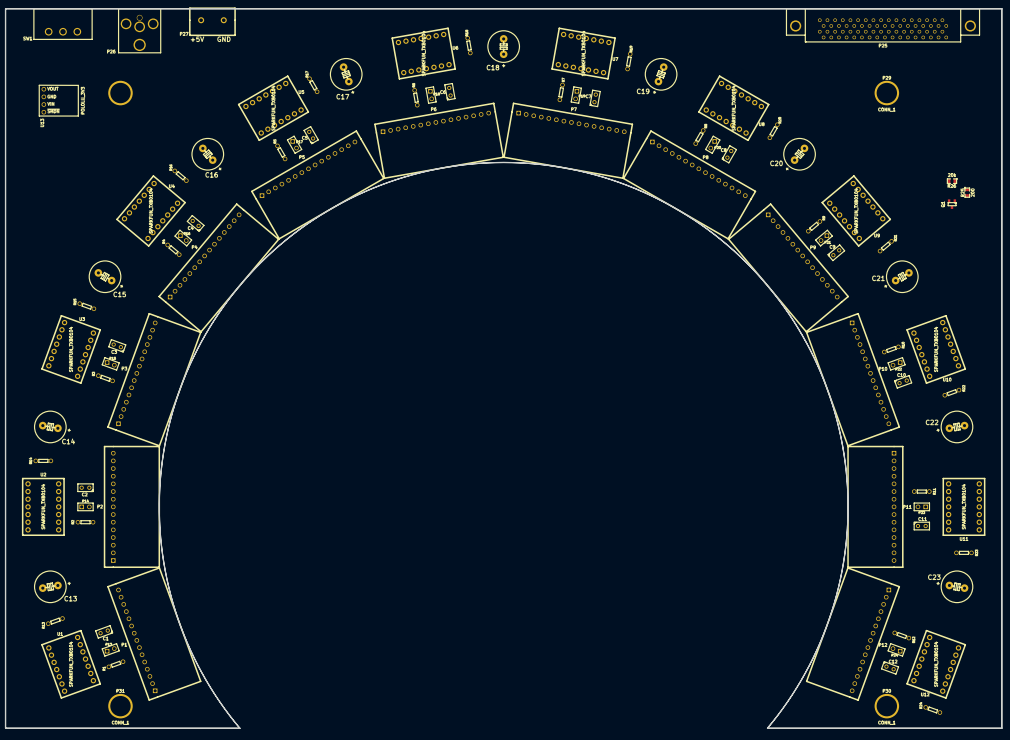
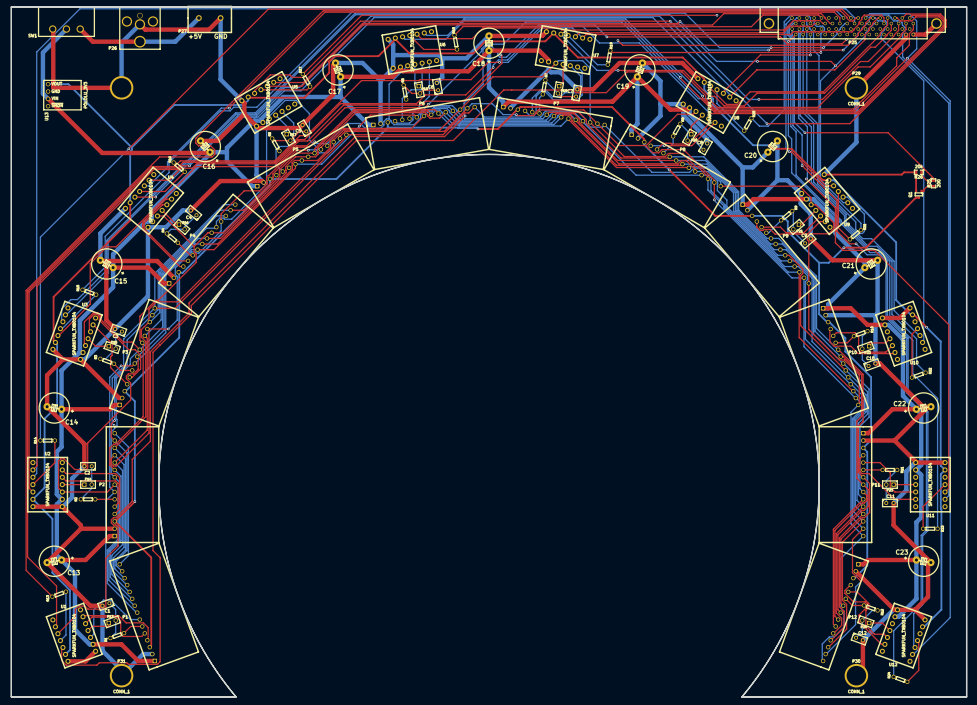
top track: none -> (716, 15) (361, 15) (302, 74)
via: none -> (716, 15)
bottom track: none -> (198, 18) (175, 41) (139, 41)
top track: none -> (220, 18) (209, 29) (145, 29) (139, 24)
bottom track: none -> (220, 18) (220, 79) (241, 100)
bottom track: none -> (792, 17) (785, 24) (785, 148) (789, 151)
bottom track: none -> (799, 17) (796, 17) (787, 26) (787, 35) (790, 37) (790, 126) (796, 131) (796, 175) (869, 249) (878, 249) (889, 261) (889, 317) (912, 340) (912, 373) (937, 398) (937, 528)
bottom track: none -> (806, 17) (806, 24) (813, 32) (813, 50) (819, 55) (819, 181) (860, 223) (860, 230)
bottom track: none -> (814, 17) (814, 23) (816, 26) (824, 27) (820, 33) (820, 52)
top track: none -> (821, 17) (818, 15) (762, 15) (751, 26) (463, 26) (454, 35)
bottom track: none -> (843, 17) (835, 10) (353, 10) (256, 107) (233, 107) (230, 110) (220, 110) (169, 162) (169, 172) (105, 236) (105, 267) (82, 289)
top track: none -> (850, 17) (842, 9) (268, 9) (128, 148)
top track: none -> (858, 17) (849, 20) (840, 10) (323, 10) (195, 138) (195, 142) (198, 145) (210, 145) (214, 150) (214, 154) (212, 156) (159, 156) (26, 290) (26, 570) (52, 596)
bottom track: none -> (865, 17) (869, 13) (909, 13) (916, 21) (916, 48) (907, 58) (950, 101) (950, 617) (912, 654)
top track: none -> (872, 17) (865, 23) (858, 34) (847, 45) (622, 45) (617, 40)
bottom track: none -> (872, 17) (886, 22) (886, 25) (881, 33) (881, 38) (923, 80) (922, 342)
top track: none -> (880, 17) (877, 17) (869, 27) (865, 34) (865, 39) (834, 69) (756, 69) (729, 97)
top track: none -> (887, 17) (887, 24) (880, 34) (823, 91) (750, 91) (737, 104) (726, 104) (710, 88) (710, 86)
top track: none -> (894, 17) (900, 20) (911, 20) (915, 16) (939, 16) (943, 20) (943, 26) (857, 112) (714, 112) (680, 77)
top track: none -> (902, 17) (906, 13) (940, 13) (946, 19) (946, 27) (849, 123) (766, 123)
top track: none -> (909, 17) (912, 15) (939, 15) (944, 20) (944, 26) (857, 113) (708, 112)
top track: none -> (670, 21) (360, 21) (304, 77) (270, 74) (254, 90) (254, 93)
bottom track: none -> (670, 21) (748, 99) (758, 99)
via: none -> (670, 21)
top track: none -> (680, 21) (677, 23) (362, 23) (303, 82) (273, 82)
bottom track: none -> (680, 21) (708, 50) (768, 50)
via: none -> (680, 21)
bottom track: none -> (795, 23) (789, 27) (789, 34) (792, 38) (792, 125) (802, 134) (802, 165)
bottom track: none -> (803, 23) (803, 30) (800, 33) (800, 115) (811, 127) (811, 182) (844, 215) (844, 222) (868, 246) (876, 246) (891, 261) (891, 314) (916, 338) (916, 363) (925, 372)
bottom track: none -> (810, 23) (810, 17) (807, 15) (790, 15) (784, 21) (784, 110) (768, 126) (759, 126) (751, 118)
top track: none -> (817, 23) (811, 26) (790, 26) (783, 32) (579, 32) (575, 36)
top track: none -> (825, 23) (819, 20) (793, 20) (784, 29) (483, 27) (472, 38) (421, 38) (417, 34)
top track: none -> (832, 23) (830, 23) (821, 13) (723, 13) (712, 25) (363, 24) (301, 86) (267, 86)
top track: none -> (839, 23) (839, 17) (834, 12) (324, 12) (229, 108)
bottom track: none -> (847, 23) (840, 28) (823, 47)
bottom track: none -> (854, 23) (854, 17) (845, 8) (79, 8) (36, 52) (36, 473) (32, 477)
bottom track: none -> (876, 23) (868, 29) (865, 35) (820, 80) (820, 179) (843, 202) (847, 202)
top track: none -> (883, 23) (883, 17) (881, 15) (864, 15) (852, 31) (793, 31) (790, 34) (586, 34) (582, 38)
top track: none -> (891, 23) (891, 30) (887, 35) (875, 47) (870, 47) (824, 93) (756, 93) (744, 105) (724, 105) (714, 96) (709, 96) (683, 70) (618, 70)
top track: none -> (898, 23) (898, 30) (868, 61) (860, 61) (822, 99) (758, 99)
top track: none -> (905, 23) (905, 29) (901, 35) (870, 66) (858, 66) (817, 107) (717, 107) (708, 98)
top track: none -> (913, 23) (913, 29) (909, 33) (909, 45) (896, 57) (896, 65) (853, 109) (715, 109) (705, 99) (705, 95) (681, 71) (627, 71) (606, 92) (575, 92) (573, 90) (503, 90) (453, 140) (356, 140) (191, 305) (191, 313) (153, 352) (153, 550) (160, 557) (160, 661) (157, 664) (99, 662) (96, 665) (66, 665) (61, 660) (62, 647)
top track: none -> (936, 23) (925, 34) (913, 34)
bottom track: none -> (139, 24) (121, 42) (121, 87)
top track: none -> (52, 29) (53, 87) (121, 87)
bottom track: none -> (66, 29) (42, 52) (42, 93) (48, 98)
top track: none -> (80, 29) (92, 41) (139, 41)
bottom track: none -> (792, 29) (792, 35) (794, 37) (794, 122) (804, 132)
bottom track: none -> (799, 29) (798, 118) (807, 126) (806, 178)
bottom track: none -> (806, 29) (806, 112) (817, 123) (817, 183) (855, 221) (855, 229) (862, 233) (864, 231) (864, 214) (847, 197) (843, 197)
top track: none -> (546, 31) (542, 35) (488, 35)
bottom track: none -> (424, 32) (426, 35) (447, 35) (463, 19) (625, 19) (702, 96)
bottom track: none -> (560, 34) (597, 70) (618, 70)
top track: none -> (795, 34) (788, 41)
bottom track: none -> (803, 34) (803, 112) (813, 123) (813, 182) (846, 214) (846, 221) (862, 238) (871, 238) (894, 261) (894, 310) (920, 335)
bottom track: none -> (810, 34) (810, 54)
top track: none -> (905, 34) (905, 38) (856, 87)
top track: none -> (409, 35) (423, 49) (457, 49)
bottom track: none -> (488, 35) (466, 58) (442, 58)
bottom track: none -> (568, 35) (597, 64) (607, 64)
bottom track: none -> (402, 36) (405, 39) (445, 39) (464, 20) (623, 20) (680, 77)
top track: none -> (606, 36) (780, 36) (787, 43) (842, 43) (846, 39)
bottom track: none -> (606, 36) (594, 24) (538, 24) (506, 57) (499, 57) (490, 45) (486, 45) (483, 49) (483, 84) (464, 103) (465, 116)
via: none -> (606, 36)
bottom track: none -> (582, 38) (572, 27) (542, 27) (508, 62) (499, 62)
bottom track: none -> (388, 39) (393, 44) (393, 68) (380, 80)
top track: none -> (395, 39) (409, 53) (473, 53) (485, 41) (545, 41) (553, 32) (577, 57) (682, 57) (704, 79) (704, 82)
top track: none -> (395, 39) (378, 56) (334, 56) (329, 61) (329, 72) (304, 97) (248, 97)
via: none -> (846, 39)
via: none -> (617, 40)
bottom track: none -> (788, 41) (788, 135) (791, 138) (791, 172) (869, 252) (878, 252) (887, 261) (887, 317) (908, 337) (908, 392) (927, 411) (927, 530) (922, 535) (922, 604) (913, 613) (915, 647)
via: none -> (788, 41)
top track: none -> (771, 47) (823, 47)
bottom track: none -> (771, 47) (719, 47) (685, 13) (355, 13) (255, 112) (235, 112) (106, 240) (106, 270) (77, 299) (70, 299) (61, 308) (62, 321)
via: none -> (771, 47)
via: none -> (823, 47)
top track: none -> (768, 50) (843, 50)
via: none -> (768, 50)
bottom track: none -> (843, 50) (857, 35) (861, 28) (869, 23) (869, 17) (871, 15) (888, 15) (893, 20) (899, 20) (905, 27) (902, 33) (902, 56) (948, 102) (948, 495) (945, 499)
via: none -> (843, 50)
bottom track: none -> (488, 50) (488, 87) (503, 101) (503, 107)
top track: none -> (610, 50) (612, 52) (820, 52)
via: none -> (820, 52)
bottom track: none -> (393, 55) (439, 55) (442, 58)
top track: none -> (500, 54) (501, 63) (464, 101) (425, 101) (421, 105) (343, 105) (307, 141) (298, 141) (276, 163) (196, 163) (192, 168) (181, 168) (169, 180) (149, 180)
via: none -> (500, 54)
top track: none -> (810, 54) (760, 54) (723, 93)
via: none -> (810, 54)
bottom track: none -> (442, 58) (442, 77) (436, 82)
top track: none -> (907, 58) (854, 110) (715, 110) (702, 96)
via: none -> (907, 58)
bottom track: none -> (429, 61) (429, 96) (412, 112) (412, 119) (409, 123) (397, 123) (395, 121)
top track: none -> (548, 61) (539, 50) (488, 50) (468, 71) (402, 71) (400, 69)
top track: none -> (757, 61) (831, 61) (835, 65)
bottom track: none -> (757, 61) (716, 61) (669, 14) (355, 14) (255, 114) (236, 114) (108, 241) (108, 272) (65, 314)
via: none -> (757, 61)
top track: none -> (499, 62) (488, 62) (470, 79) (361, 80) (306, 135) (300, 135) (274, 160) (180, 160) (174, 166) (152, 166) (27, 291) (27, 557) (56, 586) (55, 626)
via: none -> (499, 62)
top track: none -> (335, 62) (333, 65) (333, 94) (299, 128) (258, 128) (244, 113)
bottom track: none -> (335, 62) (362, 62) (380, 80)
bottom track: none -> (422, 63) (422, 88) (411, 89) (402, 98) (402, 119)
top track: none -> (555, 63) (542, 76) (492, 76) (439, 129) (343, 129) (333, 140) (333, 146) (178, 301) (156, 301) (148, 309) (148, 322)
bottom track: none -> (555, 63) (558, 60) (582, 60) (590, 68) (590, 122)
bottom track: none -> (642, 62) (660, 80) (660, 115) (637, 138)
bottom track: none -> (414, 64) (414, 82) (418, 86)
top track: none -> (563, 64) (563, 82) (559, 86)
bottom track: none -> (407, 65) (389, 84) (389, 118)
bottom track: none -> (570, 65) (580, 76) (580, 90) (578, 92) (564, 92) (560, 96) (552, 96) (545, 89) (540, 89) (532, 98) (532, 112)
via: none -> (835, 65)
top track: none -> (493, 67) (465, 94) (425, 94) (416, 103) (340, 103) (304, 139) (298, 139) (275, 162) (183, 162) (177, 168) (152, 168) (29, 291) (29, 488) (32, 491)
bottom track: none -> (493, 67) (498, 59) (507, 59) (541, 26) (582, 26) (599, 42) (639, 42) (708, 112)
via: none -> (493, 67)
bottom track: none -> (577, 67) (582, 71) (582, 94) (577, 99) (553, 99) (544, 91) (541, 91) (536, 96) (536, 113) (529, 115) (525, 110)
top track: none -> (400, 69) (392, 76) (340, 76)
via: none -> (618, 70)
bottom track: none -> (340, 76) (340, 96)
bottom track: none -> (637, 76) (637, 123) (631, 129) (631, 134)
via: none -> (680, 77)
top track: none -> (697, 78) (682, 62) (619, 62) (593, 89) (577, 89)
bottom track: none -> (545, 80) (557, 93)
bottom track: none -> (380, 80) (380, 123)
bottom track: none -> (704, 82) (704, 89) (713, 98) (713, 105) (753, 145) (768, 145)
bottom track: none -> (48, 84) (68, 84) (131, 147)
top track: none -> (403, 85) (411, 93) (420, 93) (423, 90) (438, 90)
top track: none -> (310, 86) (306, 89) (260, 89)
bottom track: none -> (856, 87) (856, 142) (824, 174)
bottom track: none -> (577, 89) (560, 72) (550, 72) (548, 69) (510, 108)
bottom track: none -> (717, 89) (717, 103) (744, 130)
top track: none -> (557, 93) (561, 96) (576, 96)
bottom track: none -> (542, 94) (539, 97) (539, 113)
via: none -> (702, 96)
bottom track: none -> (248, 97) (248, 100) (243, 104) (174, 104) (131, 147)
bottom track: none -> (340, 96) (283, 96) (261, 120)
bottom track: none -> (340, 96) (368, 124) (373, 124)
bottom track: none -> (729, 97) (729, 94) (652, 17) (374, 17) (300, 90) (284, 90) (257, 117) (238, 117) (189, 165)
top track: none -> (48, 98) (102, 152) (210, 152)
bottom track: none -> (708, 98) (698, 98) (621, 22) (525, 22) (503, 44) (486, 44) (481, 51) (428, 104)
via: none -> (758, 99)
top track: none -> (241, 100) (244, 103) (244, 113)
top track: none -> (428, 104) (424, 107) (345, 107) (307, 145) (296, 145) (275, 166) (196, 166) (116, 246) (107, 246) (90, 263) (90, 304) (57, 335)
via: none -> (428, 104)
bottom track: none -> (660, 104) (683, 104) (683, 115) (707, 139) (707, 143)
top track: none -> (474, 107) (468, 112) (464, 112) (443, 134) (346, 134) (174, 308) (154, 308)
bottom track: none -> (474, 107) (484, 117) (540, 117) (545, 111) (577, 111) (586, 119) (586, 123) (590, 127) (602, 127) (604, 124) (652, 172) (689, 172) (693, 168) (706, 168) (720, 182) (720, 186)
top track: none -> (503, 107) (508, 101) (612, 101) (637, 76) (670, 109) (687, 109) (689, 107)
bottom track: none -> (689, 107) (689, 114) (742, 167)
bottom track: none -> (229, 108) (221, 108) (167, 161) (167, 167) (148, 185) (144, 185)
via: none -> (229, 108)
top track: none -> (467, 108) (444, 131) (345, 131) (340, 138)
bottom track: none -> (467, 108) (472, 103) (492, 103) (503, 114) (516, 114)
bottom track: none -> (282, 111) (293, 123) (293, 142) (289, 146) (279, 146) (276, 149) (276, 164) (282, 171)
top track: none -> (695, 111) (693, 114) (677, 114) (646, 145)
top track: none -> (445, 112) (439, 118) (429, 118) (425, 112) (355, 112) (320, 149)
bottom track: none -> (445, 112) (455, 121) (460, 123) (551, 123) (559, 113) (569, 113) (575, 119)
top track: none -> (438, 113) (434, 109) (353, 109) (314, 148) (314, 153) (296, 153) (279, 170) (279, 176) (223, 232) (207, 232) (194, 246)
bottom track: none -> (438, 113) (449, 124) (459, 126) (560, 126) (568, 118)
top track: none -> (244, 113) (217, 140) (200, 140)
top track: none -> (516, 114) (533, 115) (538, 109) (583, 109) (619, 145) (646, 145)
via: none -> (516, 114)
bottom track: none -> (275, 115) (286, 126) (286, 134)
top track: none -> (431, 114) (427, 111) (354, 111) (317, 148) (318, 154) (315, 156) (295, 156) (285, 166) (286, 172) (220, 238) (206, 238)
bottom track: none -> (431, 114) (435, 110) (440, 110) (451, 123) (459, 124) (553, 124) (561, 117)
top track: none -> (546, 114) (549, 112) (578, 112) (586, 119) (586, 123) (620, 158) (669, 156)
bottom track: none -> (546, 114) (542, 118) (464, 118) (452, 105) (432, 105) (426, 106) (416, 117)
top track: none -> (702, 115) (691, 126) (691, 134)
top track: none -> (423, 116) (411, 128) (342, 128) (330, 140) (330, 147) (317, 160) (294, 160) (292, 162) (292, 169) (217, 244) (202, 244)
bottom track: none -> (423, 116) (434, 108) (446, 108) (460, 121) (548, 121) (553, 116)
top track: none -> (465, 116) (444, 136) (355, 136) (189, 302) (189, 313) (150, 351) (150, 441) (132, 459) (132, 501) (111, 519) (111, 522) (118, 527) (118, 545) (105, 558) (105, 607) (103, 609) (88, 609) (85, 606) (78, 606) (75, 609) (75, 616) (57, 633)
via: none -> (465, 116)
top track: none -> (553, 116) (556, 113) (574, 113) (579, 118) (579, 121) (617, 160) (676, 160)
top track: none -> (416, 117) (414, 115) (370, 115) (359, 126)
top track: none -> (561, 117) (563, 115) (570, 115) (571, 120) (616, 165) (682, 164)
bottom track: none -> (389, 118) (383, 121) (383, 125) (380, 128) (365, 128) (360, 123) (347, 123) (327, 143)
bottom track: none -> (389, 118) (393, 124) (414, 124) (425, 109) (431, 109) (434, 107) (449, 107) (462, 120) (546, 120) (552, 112) (574, 112) (636, 175) (708, 175) (711, 177) (710, 190) (725, 207) (784, 266) (798, 266) (807, 275) (805, 281) (805, 339) (864, 397) (864, 410) (855, 419) (855, 506) (863, 514)
top track: none -> (568, 118) (616, 167) (688, 167)
top track: none -> (708, 118) (708, 124) (688, 144) (663, 143) (657, 149)
top track: none -> (575, 119) (618, 163) (678, 163) (681, 160) (686, 160) (695, 171)
bottom track: none -> (261, 120) (254, 120) (226, 147) (226, 160) (252, 186) (257, 186)
bottom track: none -> (387, 122) (387, 127)
top track: none -> (590, 122) (624, 156) (665, 156) (668, 153) (683, 153) (707, 178)
top track: none -> (715, 122) (691, 145) (664, 145)
bottom track: none -> (680, 123) (687, 131) (687, 140) (694, 140) (703, 149)
bottom track: none -> (766, 123) (659, 16) (370, 16) (299, 87) (284, 87) (256, 115) (237, 115) (155, 197)
via: none -> (766, 123)
bottom track: none -> (359, 126) (321, 164) (295, 164)
via: none -> (359, 126)
bottom track: none -> (256, 126) (256, 175) (263, 182)
bottom track: none -> (387, 127) (336, 179) (270, 179)
bottom track: none -> (387, 127) (478, 129)
top track: none -> (478, 129) (497, 129) (520, 106) (612, 106) (644, 139) (644, 142)
via: none -> (478, 129)
top track: none -> (306, 131) (299, 131) (290, 140) (274, 140) (272, 138)
top track: none -> (804, 132) (888, 132) (933, 178) (933, 180)
via: none -> (804, 132)
bottom track: none -> (673, 136) (673, 143) (663, 153)
bottom track: none -> (340, 138) (327, 152) (308, 150)
bottom track: none -> (777, 140) (777, 180)
top track: none -> (314, 141) (309, 147) (296, 147) (266, 177) (267, 183) (260, 190) (244, 190) (221, 213) (221, 221)
bottom track: none -> (314, 141) (316, 143) (327, 143)
via: none -> (314, 141)
bottom track: none -> (644, 142) (644, 144) (669, 169)
top track: none -> (768, 145) (772, 148) (791, 148) (822, 180) (828, 180)
top track: none -> (646, 145) (652, 152) (658, 152) (661, 149) (683, 149) (714, 180) (714, 199)
bottom track: none -> (664, 145) (650, 145)
via: none -> (664, 145)
bottom track: none -> (131, 147) (130, 202)
bottom track: none -> (128, 148) (40, 237) (40, 440)
via: none -> (128, 148)
bottom track: none -> (320, 149) (309, 139) (309, 113) (296, 100) (285, 100) (266, 121) (266, 183) (231, 219) (219, 218) (216, 221) (215, 228) (206, 228) (161, 273) (161, 319) (144, 335)
top track: none -> (308, 150) (296, 150) (272, 173) (273, 180) (243, 210) (230, 210)
via: none -> (308, 150)
top track: none -> (789, 151) (791, 151) (825, 185) (833, 185)
via: none -> (789, 151)
bottom track: none -> (226, 152) (210, 152) (151, 210) (151, 221)
bottom track: none -> (767, 152) (752, 167) (742, 167)
bottom track: none -> (669, 156) (703, 156) (738, 191) (738, 210) (767, 238) (778, 238) (816, 276) (816, 328) (838, 349)
bottom track: none -> (676, 160) (705, 160) (737, 192) (737, 210) (770, 244) (782, 244) (815, 276) (815, 331) (840, 356)
top track: none -> (295, 164) (295, 168) (214, 249) (197, 249)
bottom track: none -> (682, 164) (706, 164) (735, 192) (735, 210) (774, 249) (785, 249) (813, 277) (813, 334) (869, 389) (869, 417) (859, 426) (859, 488) (863, 491)
top track: none -> (189, 165) (181, 165) (177, 169) (153, 169) (37, 286) (37, 465) (32, 469)
via: none -> (189, 165)
top track: none -> (802, 165) (836, 200) (836, 231) (849, 243) (856, 243)
via: none -> (802, 165)
bottom track: none -> (742, 167) (742, 204)
bottom track: none -> (688, 167) (707, 166) (733, 192) (733, 211) (777, 255) (785, 255)
top track: none -> (669, 169) (715, 215) (752, 215)
via: none -> (669, 169)
top track: none -> (184, 171) (165, 191) (139, 191)
bottom track: none -> (695, 171) (708, 171) (717, 181) (717, 190) (726, 200) (726, 206) (781, 260) (795, 260) (812, 277) (812, 341) (866, 394) (866, 411) (856, 421) (856, 500) (863, 506)
top track: none -> (921, 172) (921, 175) (929, 183) (923, 191) (921, 191)
top track: none -> (824, 174) (901, 174) (904, 172) (916, 172) (916, 191)
bottom track: none -> (270, 178) (270, 185) (182, 272) (179, 272)
bottom track: none -> (707, 178) (707, 189) (723, 207) (788, 272) (799, 272)
top track: none -> (806, 178) (835, 208) (835, 242) (842, 250) (874, 250) (948, 324) (948, 488) (945, 491)
via: none -> (806, 178)
bottom track: none -> (777, 180) (787, 180) (800, 193)
bottom track: none -> (777, 180) (747, 210)
bottom track: none -> (828, 180) (833, 180) (896, 242) (896, 300) (912, 314)
top track: none -> (263, 182) (220, 181) (190, 210)
top track: none -> (720, 186) (799, 186) (811, 197) (811, 204) (815, 204) (833, 222) (833, 228) (828, 233) (810, 233) (807, 237) (808, 329) (839, 359) (844, 359) (859, 374) (858, 404)
top track: none -> (838, 191) (838, 227) (849, 239)
bottom track: none -> (800, 193) (800, 203) (810, 213) (810, 238)
top track: none -> (134, 197) (155, 197)
via: none -> (155, 197)
top track: none -> (918, 197) (916, 197) (865, 247) (843, 247)
top track: none -> (171, 199) (165, 199) (142, 222) (142, 229) (179, 266) (183, 266)
bottom track: none -> (714, 199) (791, 277) (803, 277)
via: none -> (714, 199)
top track: none -> (806, 199) (753, 199) (747, 204) (742, 204)
bottom track: none -> (806, 199) (813, 199) (835, 221) (835, 233) (864, 262) (864, 267) (828, 304) (828, 308) (823, 308)
top track: none -> (130, 202) (130, 220) (53, 296) (53, 340) (55, 342)
top track: none -> (166, 204) (162, 204) (144, 223) (144, 228) (176, 260) (188, 260)
bottom track: none -> (235, 204) (223, 204) (154, 273) (154, 308) (123, 339) (123, 366) (112, 378) (112, 423) (114, 425)
bottom track: none -> (125, 208) (100, 233) (100, 260)
top track: none -> (162, 210) (175, 224) (179, 224)
bottom track: none -> (190, 210) (182, 210) (165, 227) (147, 227) (147, 296) (84, 359) (80, 359)
bottom track: none -> (230, 210) (220, 210) (158, 272) (158, 309) (127, 339) (127, 365) (114, 377) (114, 420)
top track: none -> (815, 210) (802, 224) (798, 224)
bottom track: none -> (792, 211) (793, 231) (805, 243)
bottom track: none -> (196, 215) (184, 229) (171, 229) (166, 233)
top track: none -> (157, 216) (163, 216) (194, 246)
bottom track: none -> (225, 215) (216, 215) (159, 272) (159, 312) (149, 322)
bottom track: none -> (752, 215) (782, 215) (787, 221) (787, 231) (819, 262)
top track: none -> (820, 216) (803, 232) (785, 232) (780, 227) (761, 227)
bottom track: none -> (781, 220) (768, 232) (766, 232)
bottom track: none -> (152, 221) (145, 221) (113, 254) (113, 287) (79, 320) (79, 352)
bottom track: none -> (221, 221) (221, 230) (198, 253) (191, 251) (175, 268) (177, 276) (177, 320) (168, 328)
top track: none -> (756, 221) (756, 227) (760, 230) (770, 229) (775, 234) (807, 234) (820, 221) (825, 221)
bottom track: none -> (206, 238) (198, 238) (162, 274) (162, 327) (130, 358) (130, 364) (116, 378) (117, 426) (111, 431) (111, 473) (119, 482) (119, 539) (108, 550) (108, 580) (134, 605)
top track: none -> (810, 238) (832, 260) (877, 260)
top track: none -> (177, 242) (190, 255) (192, 255)
bottom track: none -> (202, 244) (195, 244) (164, 274) (164, 330) (137, 356)
bottom track: none -> (856, 243) (867, 254) (878, 254) (886, 261) (886, 317) (906, 338) (906, 392) (926, 412) (926, 530) (921, 535) (921, 603) (893, 630) (893, 676)
via: none -> (856, 243)
top track: none -> (194, 246) (196, 262) (139, 316) (139, 340) (143, 343) (143, 416) (109, 447) (109, 465) (114, 469)
bottom track: none -> (843, 247) (828, 262) (819, 262)
via: none -> (843, 247)
bottom track: none -> (197, 249) (191, 249) (165, 275) (165, 332) (134, 363)
top track: none -> (785, 255) (789, 255) (802, 268) (800, 275) (800, 325) (845, 370)
top track: none -> (100, 260) (157, 261) (173, 277)
bottom track: none -> (877, 260) (877, 313) (875, 315) (825, 315)
top track: none -> (106, 261) (106, 320) (115, 328)
bottom track: none -> (819, 262) (819, 314) (845, 338) (845, 351) (871, 377) (871, 440) (863, 447) (867, 451) (867, 565) (853, 578)
top track: none -> (113, 267) (148, 267) (164, 283) (169, 283)
bottom track: none -> (179, 272) (179, 337) (125, 391)
top track: none -> (799, 272) (799, 337) (853, 391)
bottom track: none -> (803, 277) (803, 346) (861, 403) (861, 409) (852, 418) (852, 517) (863, 528)
bottom track: none -> (96, 294) (60, 328)
top track: none -> (823, 308) (850, 308) (867, 324) (884, 324)
top track: none -> (910, 307) (899, 317) (882, 317)
top track: none -> (912, 314) (926, 327)
bottom track: none -> (875, 315) (875, 363)
top track: none -> (148, 322) (141, 329) (141, 337) (145, 341) (145, 416) (114, 447)
top track: none -> (93, 324) (112, 343) (110, 367) (127, 384)
bottom track: none -> (884, 324) (888, 324) (902, 339) (902, 395) (921, 414) (921, 464) (916, 469)
bottom track: none -> (926, 327) (940, 341) (940, 465) (945, 469) (940, 474) (941, 609) (922, 626)
via: none -> (926, 327)
top track: none -> (147, 328) (168, 328)
top track: none -> (148, 328) (148, 433) (116, 466) (111, 463) (111, 458) (114, 455)
via: none -> (168, 328)
top track: none -> (830, 328) (829, 341) (834, 346) (850, 346) (858, 353) (894, 352)
top track: none -> (917, 328) (912, 334) (912, 377)
bottom track: none -> (867, 331) (862, 336) (862, 359) (868, 366)
top track: none -> (90, 331) (89, 319) (94, 314) (97, 314) (99, 320) (128, 349) (135, 349) (140, 355) (140, 368) (132, 377) (129, 377)
bottom track: none -> (121, 331) (115, 337) (115, 348) (105, 358) (100, 358)
top track: none -> (144, 335) (147, 338) (147, 429) (114, 462)
top track: none -> (833, 335) (836, 332) (855, 332) (858, 336) (858, 349) (860, 352) (885, 352) (892, 345)
top track: none -> (853, 336) (847, 342) (835, 342)
top track: none -> (88, 338) (95, 346) (108, 346)
top track: none -> (889, 338) (885, 342) (869, 342) (869, 346)
bottom track: none -> (55, 342) (57, 344) (57, 406) (44, 418) (44, 487) (32, 499) (52, 518) (52, 572) (69, 590) (69, 649) (65, 654)
top track: none -> (85, 345) (84, 321) (93, 312) (97, 312) (100, 319) (123, 342) (132, 342) (139, 349)
top track: none -> (52, 349) (62, 359)
top track: none -> (838, 349) (863, 374) (863, 421) (858, 426) (858, 472) (869, 483) (869, 512) (840, 539) (840, 603) (843, 605)
bottom track: none -> (83, 352) (79, 352) (61, 370) (61, 447) (56, 451) (56, 494) (61, 499)
top track: none -> (137, 356) (138, 369) (133, 373) (126, 375) (130, 382) (130, 399) (87, 442) (87, 467) (74, 469) (63, 458) (58, 461) (58, 488) (62, 491) (107, 491) (114, 484)
top track: none -> (840, 356) (843, 356) (861, 375) (861, 416) (856, 421) (856, 478) (868, 489) (868, 506) (837, 534) (837, 609) (840, 612)
top track: none -> (62, 359) (47, 375) (47, 406) (84, 443) (84, 466)
top track: none -> (62, 359) (80, 359) (119, 398) (122, 398)
top track: none -> (113, 363) (120, 370) (132, 370)
top track: none -> (134, 363) (132, 365) (121, 365)
top track: none -> (875, 363) (880, 363) (925, 409)
bottom track: none -> (121, 365) (109, 377) (109, 487) (114, 491) (105, 500) (105, 600)
via: none -> (121, 365)
bottom track: none -> (845, 370) (867, 391) (867, 414) (858, 423) (858, 494) (863, 499)
bottom track: none -> (125, 391) (134, 401) (134, 501)
bottom track: none -> (853, 391) (863, 400) (863, 410) (853, 419) (853, 511) (863, 521)
top track: none -> (119, 404) (114, 404) (110, 409) (61, 409)
bottom track: none -> (858, 404) (850, 412) (850, 523) (863, 536) (839, 559) (839, 607) (844, 611) (844, 627) (834, 636) (829, 636) (822, 643) (823, 660)
top track: none -> (930, 406) (928, 406) (894, 440)
top track: none -> (916, 409) (892, 409) (868, 433) (863, 433)
top track: none -> (114, 420) (111, 423) (111, 437) (114, 440)
via: none -> (114, 420)
via: none -> (114, 425)
bottom track: none -> (114, 433) (128, 446) (128, 555) (119, 564)
top track: none -> (54, 440) (54, 462) (32, 484)
bottom track: none -> (114, 440) (126, 452) (126, 550) (116, 561) (116, 565) (122, 571)
top track: none -> (863, 440) (894, 440)
top track: none -> (894, 440) (915, 462) (945, 462)
bottom track: none -> (114, 447) (125, 458) (125, 550) (114, 560) (114, 568) (124, 578)
bottom track: none -> (114, 455) (123, 464) (123, 547) (113, 557) (113, 571) (127, 585)
top track: none -> (863, 455) (859, 458) (859, 471) (862, 473) (868, 473) (894, 499) (915, 499)
bottom track: none -> (114, 462) (122, 470) (122, 544) (111, 555) (111, 574) (129, 591)
top track: none -> (863, 462) (879, 462) (890, 472) (890, 487) (894, 491) (915, 491)
bottom track: none -> (915, 462) (906, 471) (906, 490) (893, 503)
bottom track: none -> (84, 466) (72, 478) (72, 497) (62, 506)
bottom track: none -> (91, 466) (91, 488) (80, 499)
top track: none -> (62, 469) (65, 473) (115, 473) (119, 477) (119, 509) (114, 514)
bottom track: none -> (114, 469) (120, 476) (120, 540) (110, 551) (110, 577) (132, 598)
top track: none -> (863, 469) (882, 469)
bottom track: none -> (897, 469) (886, 480) (886, 503)
bottom track: none -> (916, 469) (921, 474) (921, 517) (916, 522) (916, 598) (898, 616) (894, 616)
top track: none -> (62, 477) (65, 480) (115, 480) (118, 483) (118, 503) (114, 506)
top track: none -> (62, 484) (84, 484)
bottom track: none -> (114, 484) (117, 487) (117, 539) (107, 549) (107, 583) (137, 612)
top track: none -> (893, 484) (915, 484)
top track: none -> (945, 484) (923, 506) (923, 528)
top track: none -> (863, 491) (866, 495) (866, 500) (834, 530) (834, 616) (838, 619)
bottom track: none -> (61, 499) (56, 504) (56, 555) (74, 573) (74, 629) (89, 644) (93, 644)
top track: none -> (95, 499) (114, 499)
top track: none -> (863, 499) (833, 529) (833, 624) (835, 626)
top track: none -> (134, 501) (115, 521)
via: none -> (134, 501)
top track: none -> (893, 503) (893, 525) (928, 559) (928, 596) (915, 609)
top track: none -> (32, 506) (62, 506) (80, 525) (80, 528)
top track: none -> (863, 506) (836, 533) (836, 612) (841, 618) (841, 625) (833, 633)
top track: none -> (863, 514) (839, 537) (839, 606) (844, 611) (844, 627) (830, 640)
top track: none -> (115, 521) (151, 557) (149, 647)
top track: none -> (863, 521) (842, 542) (842, 600) (846, 604) (846, 629) (828, 647)
top track: none -> (80, 528) (114, 528)
top track: none -> (80, 528) (47, 562) (90, 605) (102, 605)
top track: none -> (863, 528) (852, 539) (852, 572) (860, 582)
top track: none -> (114, 536) (109, 536) (85, 559) (61, 559)
top track: none -> (916, 559) (867, 559) (863, 564) (858, 564)
top track: none -> (855, 571) (894, 609) (915, 609)
bottom track: none -> (860, 582) (855, 587) (855, 624) (825, 654)
top track: none -> (850, 585) (844, 590) (844, 593) (853, 601) (865, 601) (867, 604) (867, 606) (858, 615) (858, 621) (881, 644) (884, 644)
bottom track: none -> (65, 591) (65, 635) (60, 640)
top track: none -> (848, 591) (857, 591) (868, 603) (868, 607) (865, 610) (865, 625) (874, 634) (884, 634) (887, 637)
top track: none -> (845, 598) (852, 605) (863, 605)
bottom track: none -> (109, 603) (115, 609) (115, 632) (110, 638)
bottom track: none -> (102, 605) (102, 650) (124, 672)
bottom track: none -> (897, 609) (893, 609) (862, 640)
top track: none -> (915, 609) (925, 619)
bottom track: none -> (877, 610) (872, 610) (862, 620) (862, 631) (856, 637)
top track: none -> (83, 616) (118, 615) (126, 622) (143, 622) (148, 627) (147, 640)
bottom track: none -> (139, 619) (130, 619) (110, 600) (103, 600) (93, 609) (93, 634) (90, 637)
top track: none -> (85, 623) (92, 617) (116, 617) (120, 620) (120, 634) (122, 636) (141, 636) (144, 633)
top track: none -> (108, 623) (108, 626) (92, 626) (88, 630)
top track: none -> (869, 623) (882, 623) (889, 630)
top track: none -> (142, 626) (130, 626) (124, 633)
top track: none -> (862, 640) (862, 669) (856, 675)
top track: none -> (917, 640) (918, 670) (907, 681)
top track: none -> (93, 644) (121, 644) (138, 660) (154, 660)
top track: none -> (95, 651) (85, 661) (67, 661)
bottom track: none -> (152, 654) (143, 654) (121, 675)

